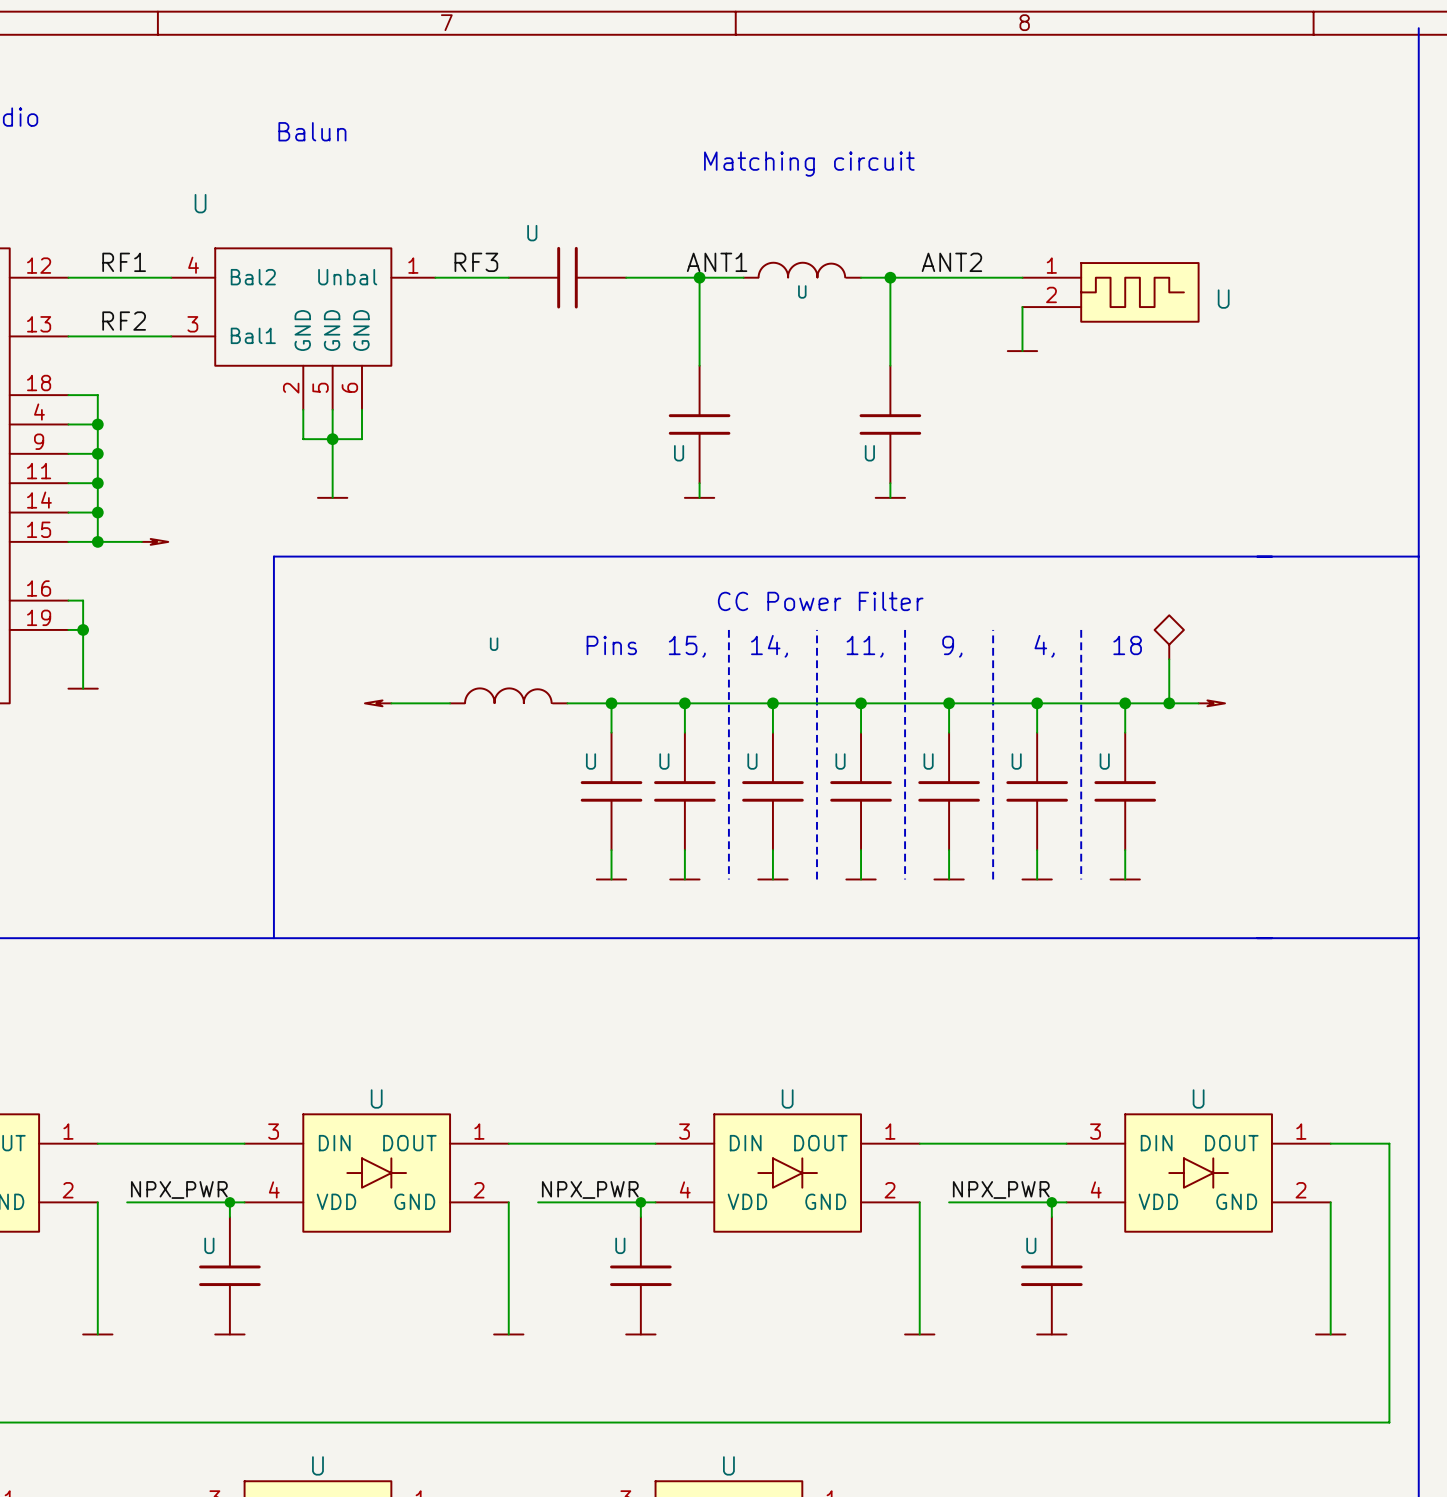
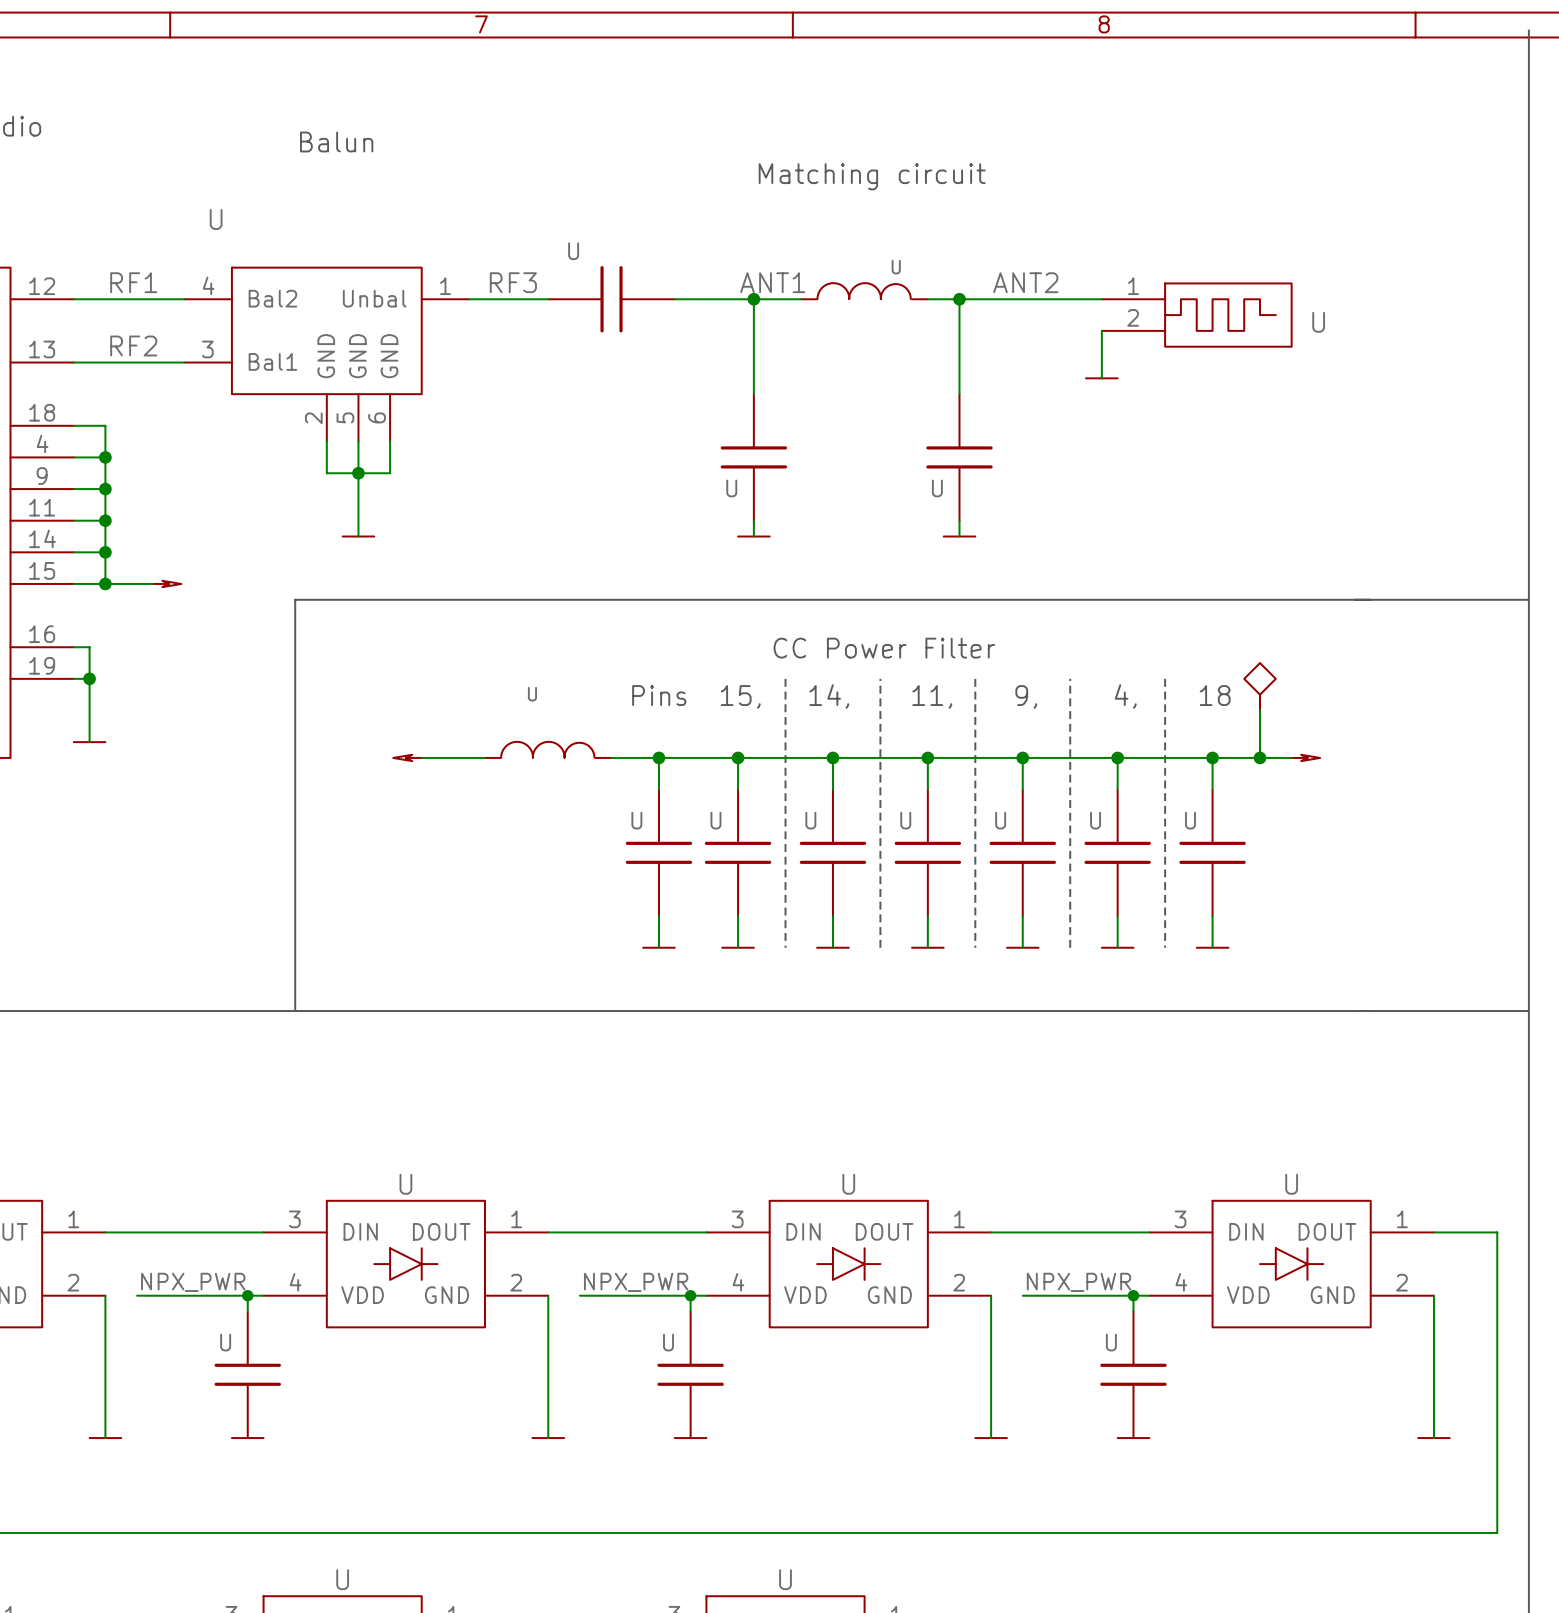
U name position: U (802, 291) -> U (896, 267)

